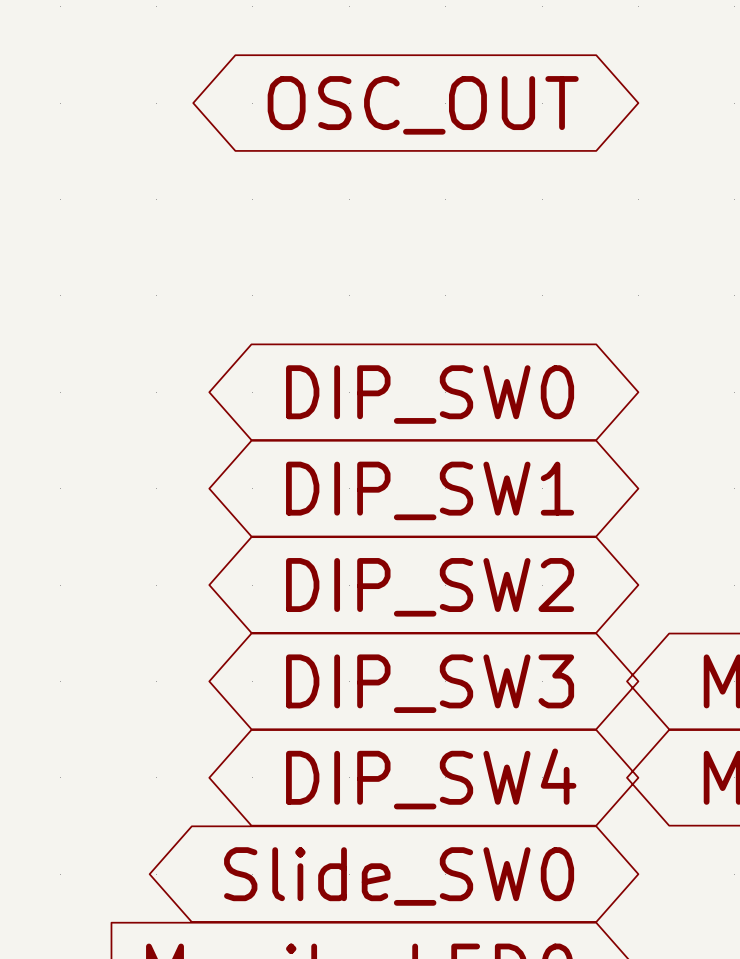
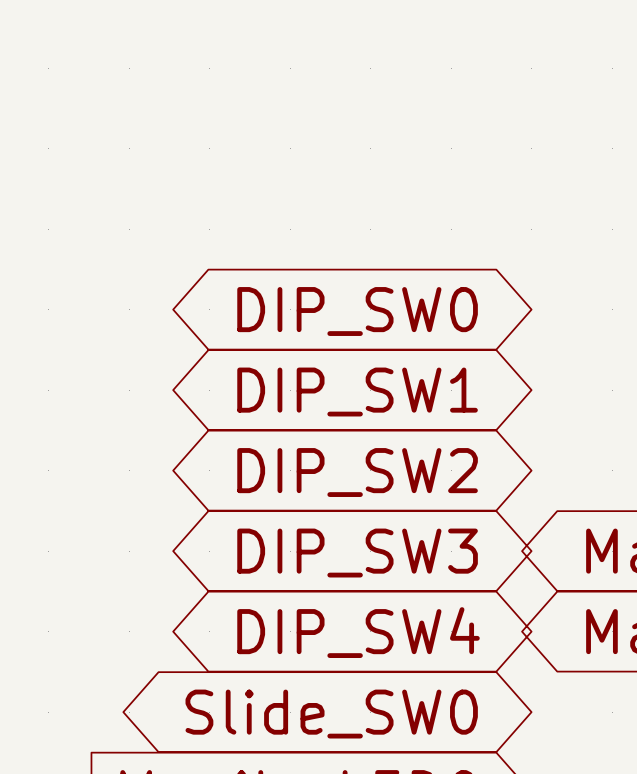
global label: OSC_OUT (423, 105) -> none

